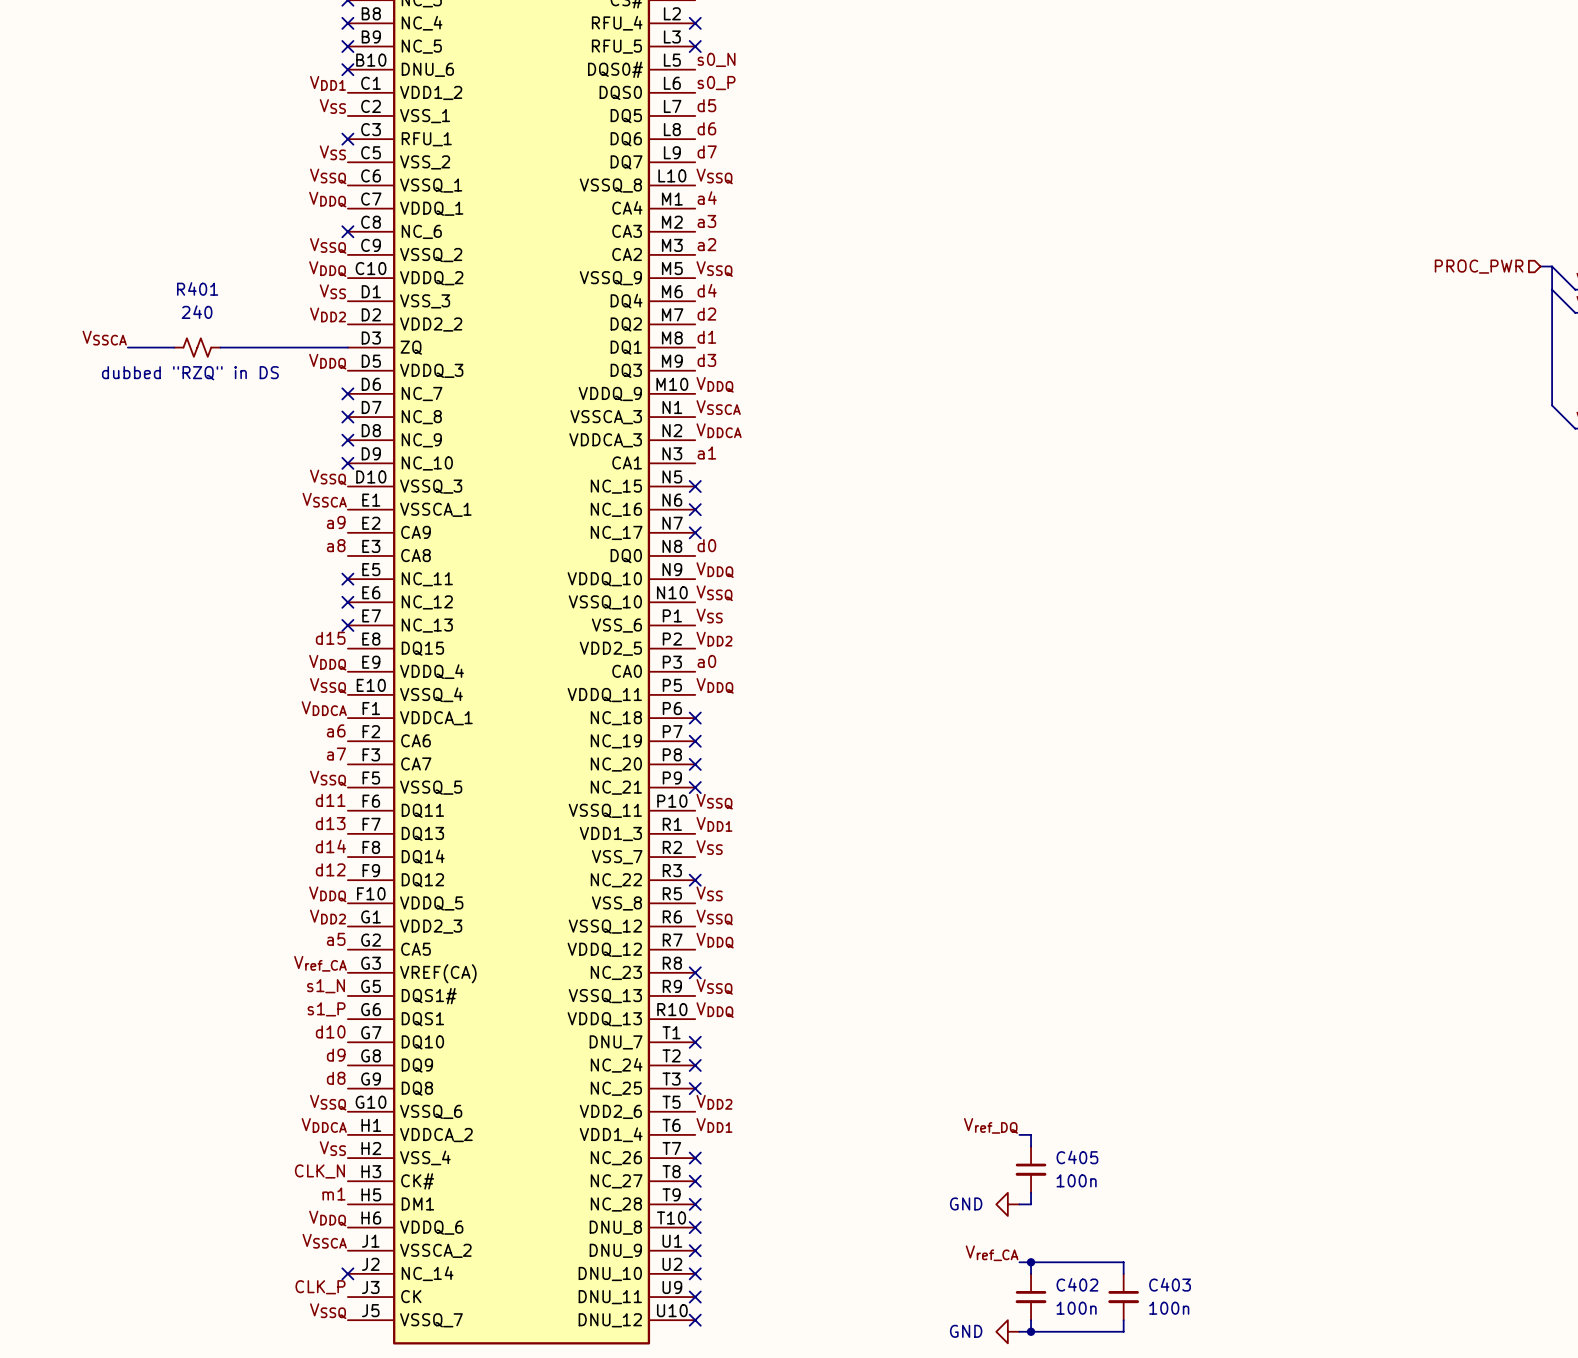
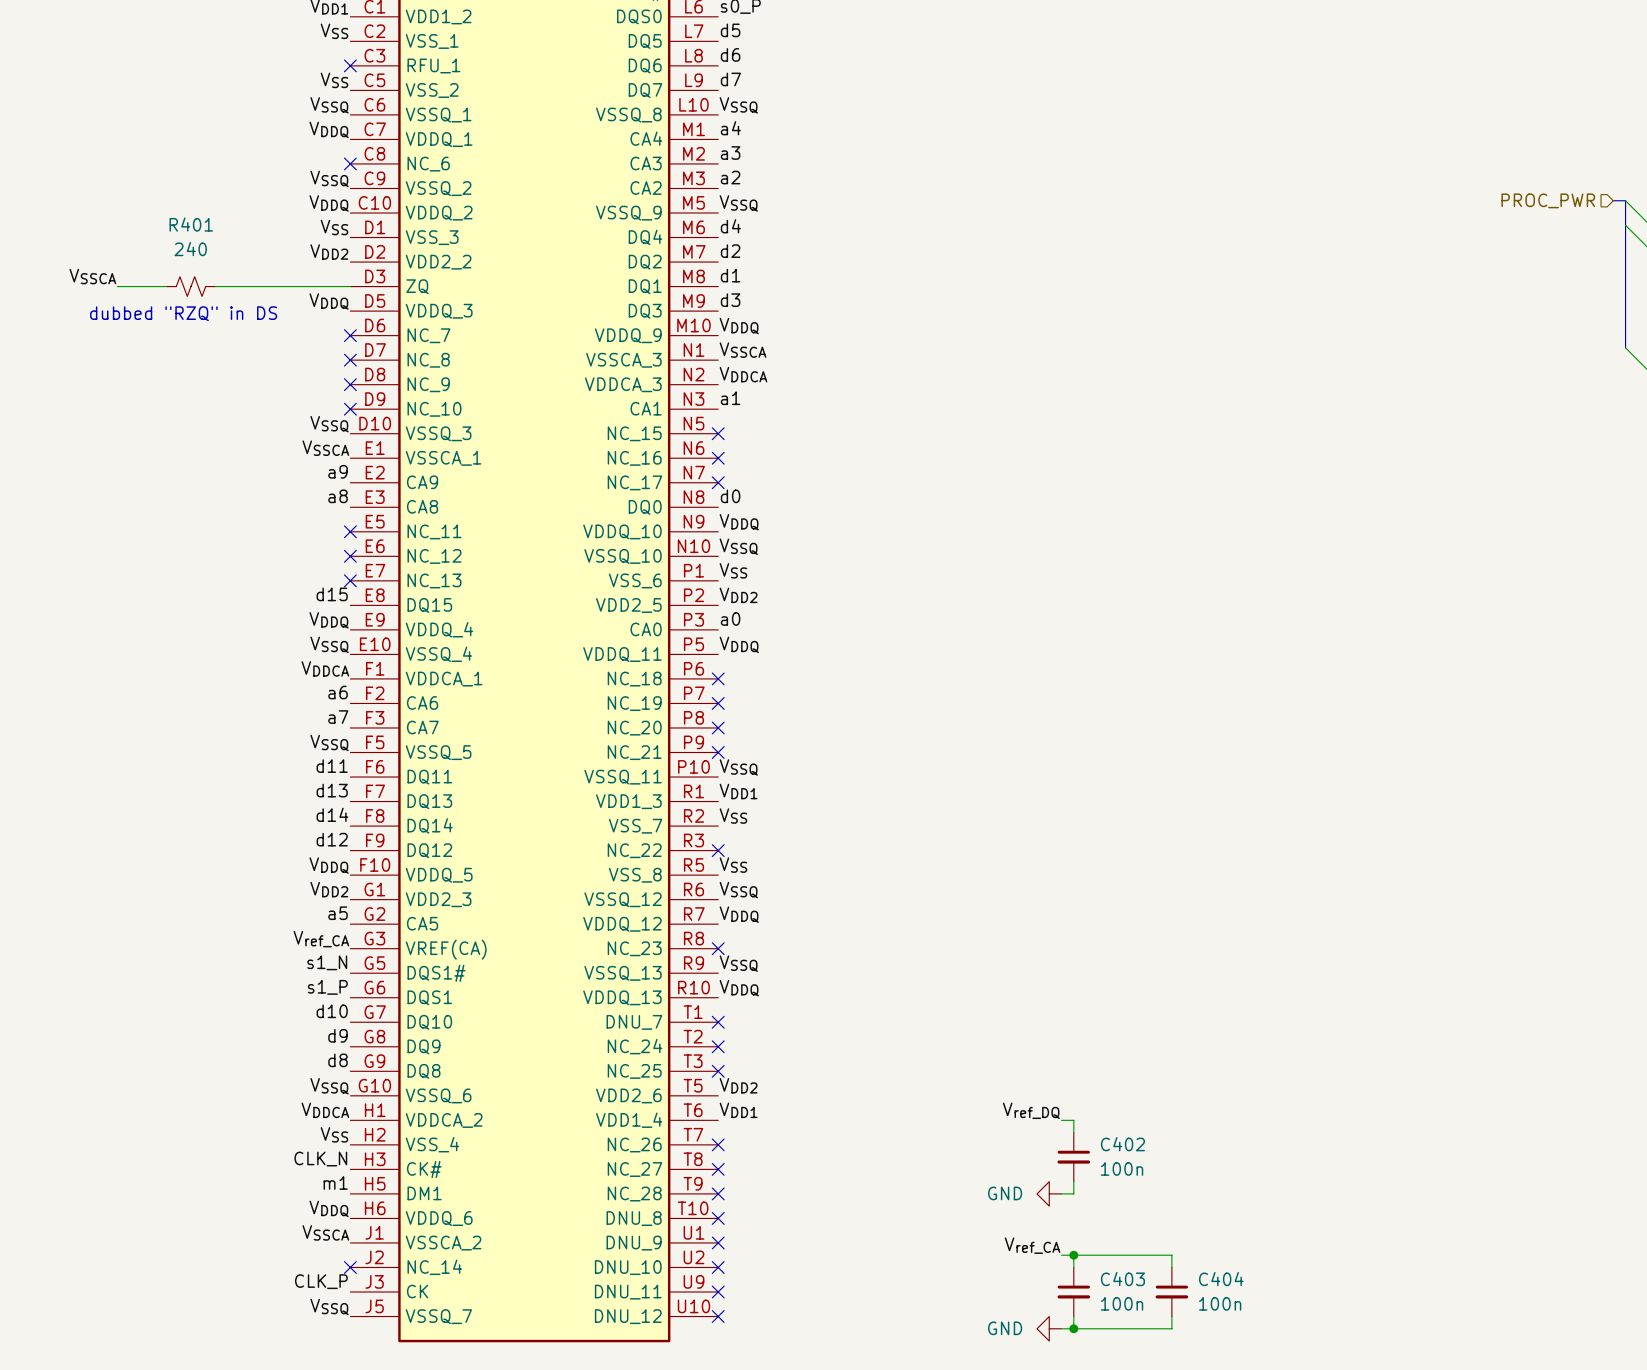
C405 name: C405 (1077, 1157) -> C402 (1122, 1144)
C402 name: C402 (1077, 1284) -> C403 (1122, 1279)
C403 name: C403 (1170, 1284) -> C404 (1221, 1279)

